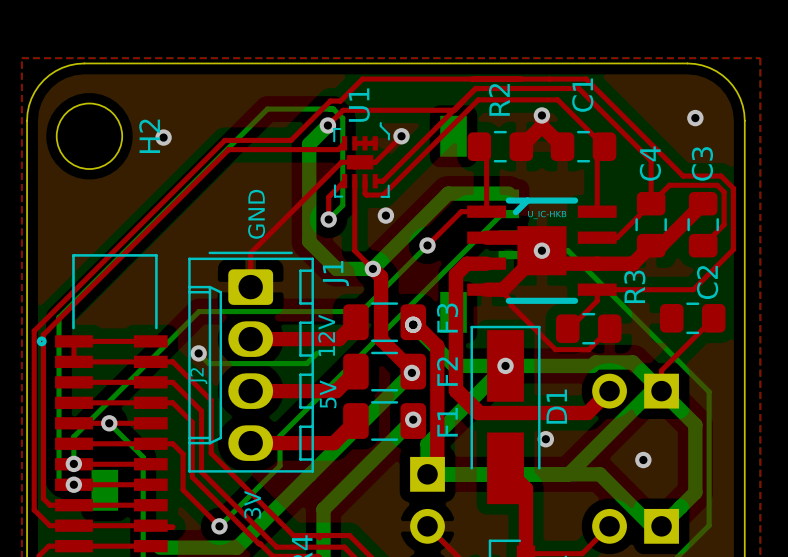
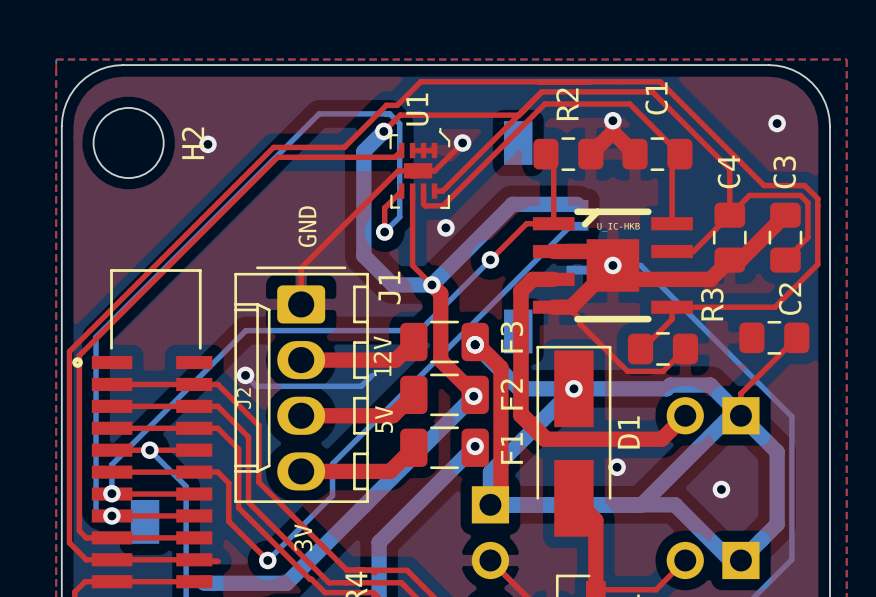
top track: (150, 341) (73, 341) (73, 361) -> none

